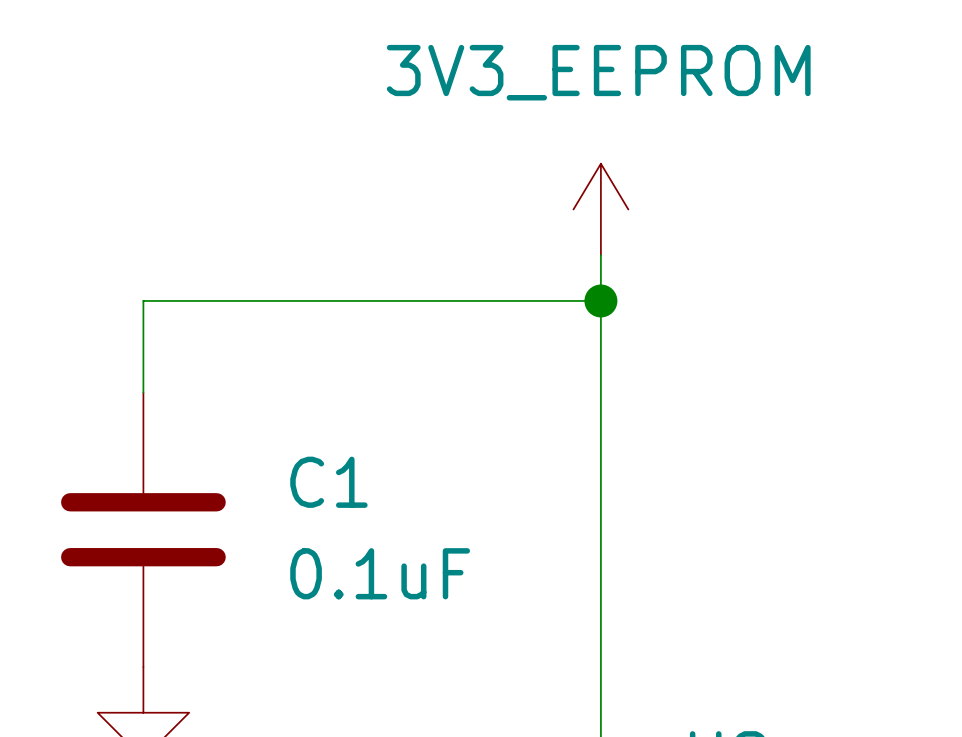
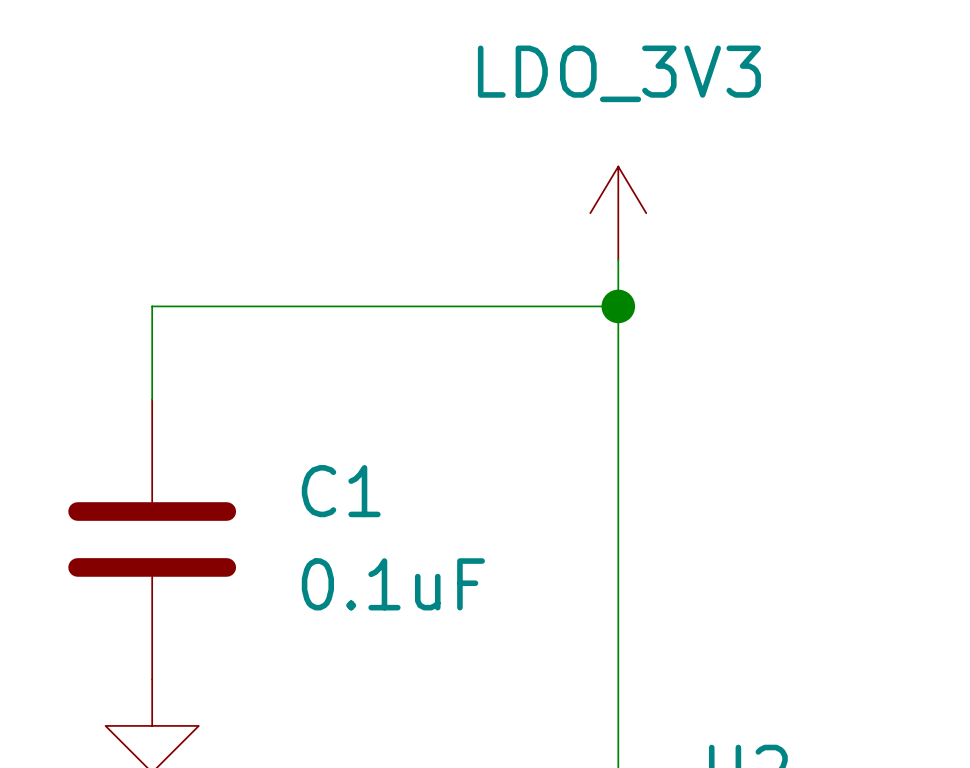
power symbol: 3V3_EEPROM (600, 209) -> LDO_3V3 (618, 213)

